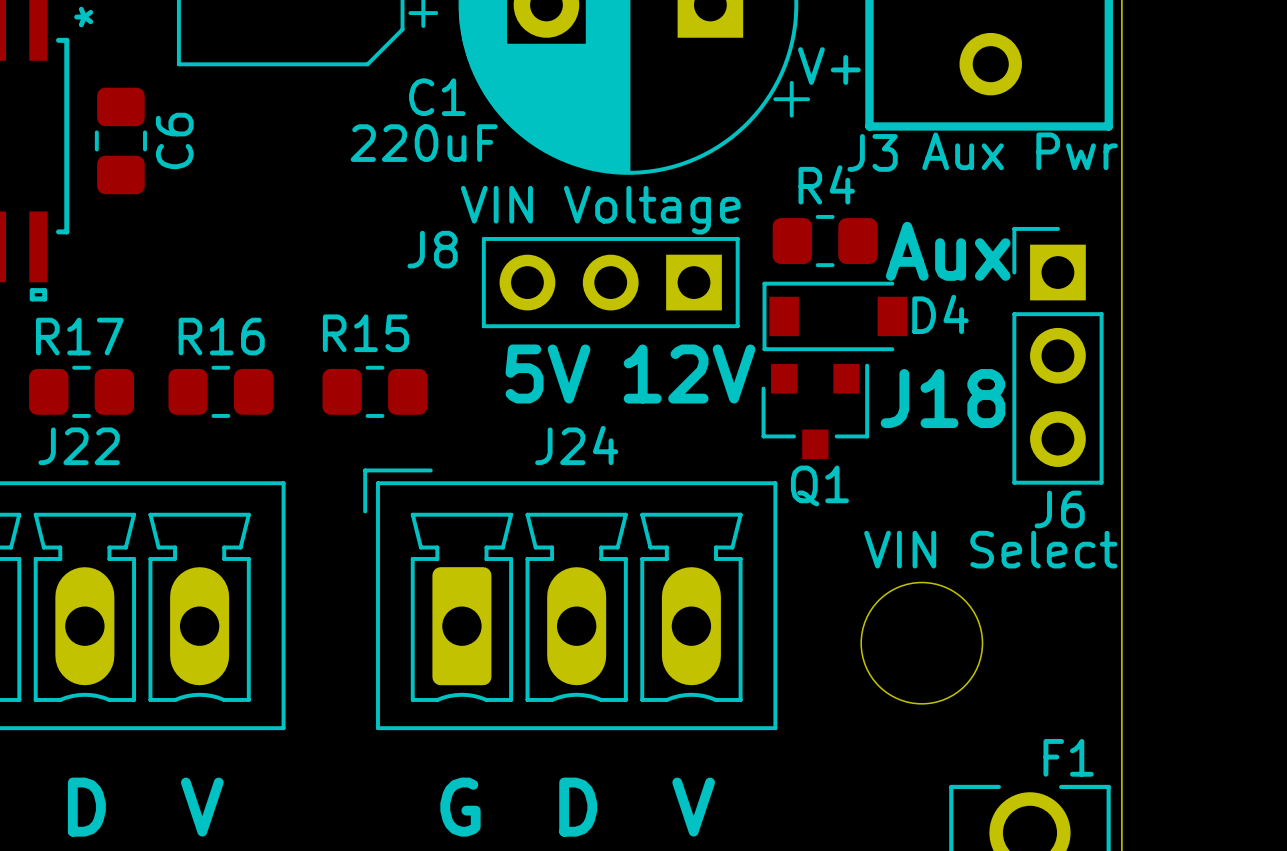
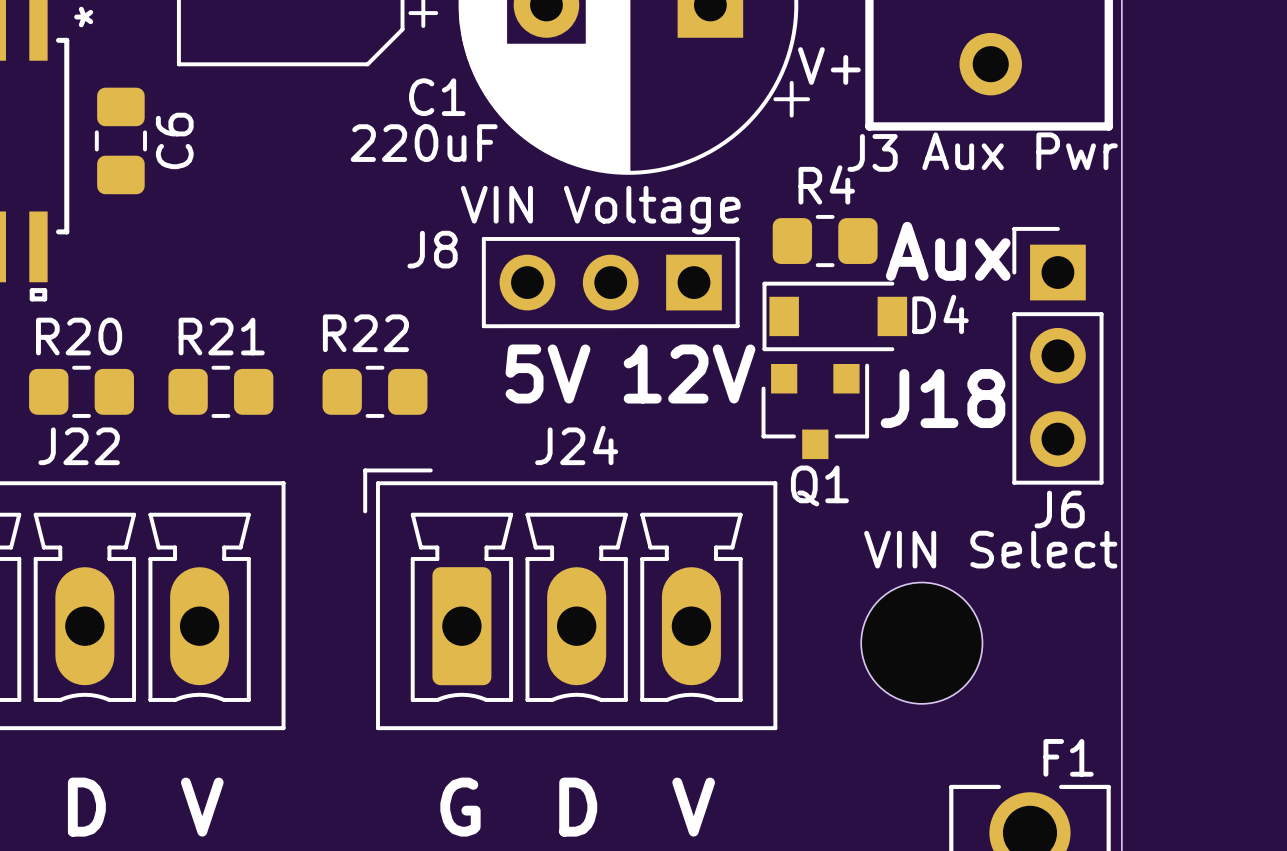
R15 name: R15 (365, 333) -> R22 (365, 333)
R17 name: R17 (79, 336) -> R20 (79, 336)
R16 name: R16 (221, 336) -> R21 (221, 336)

